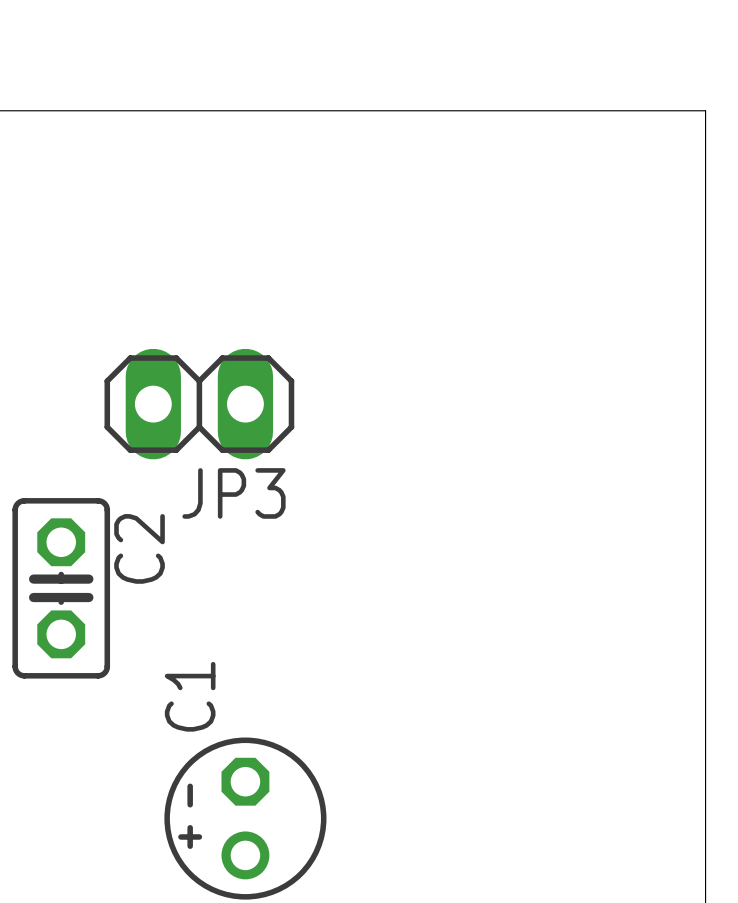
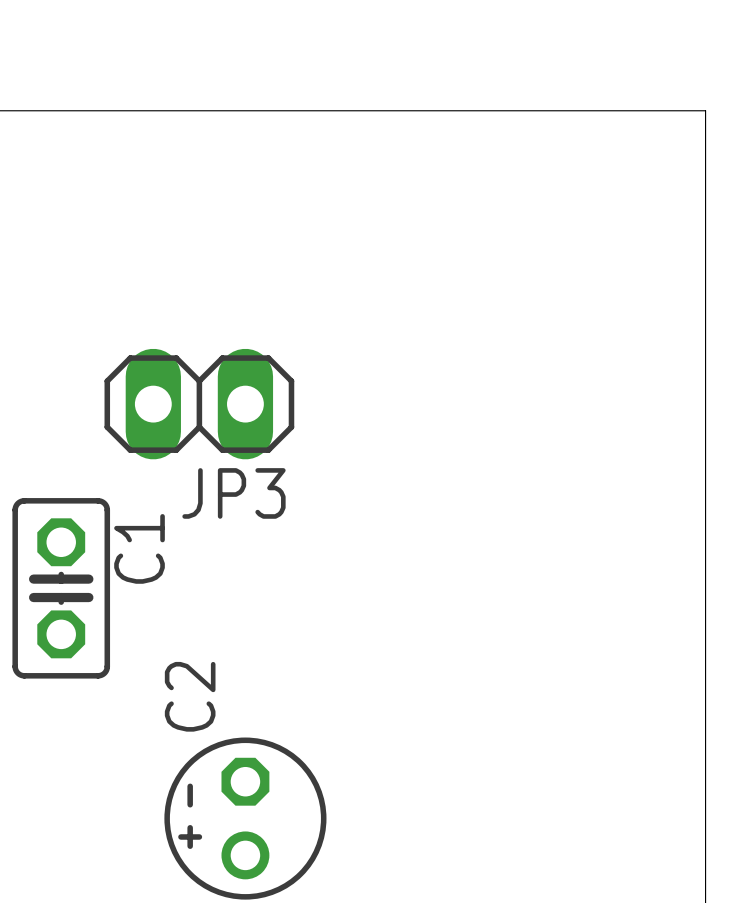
C2 name: C2 (139, 548) -> C1 (139, 548)
C1 name: C1 (190, 696) -> C2 (190, 696)

